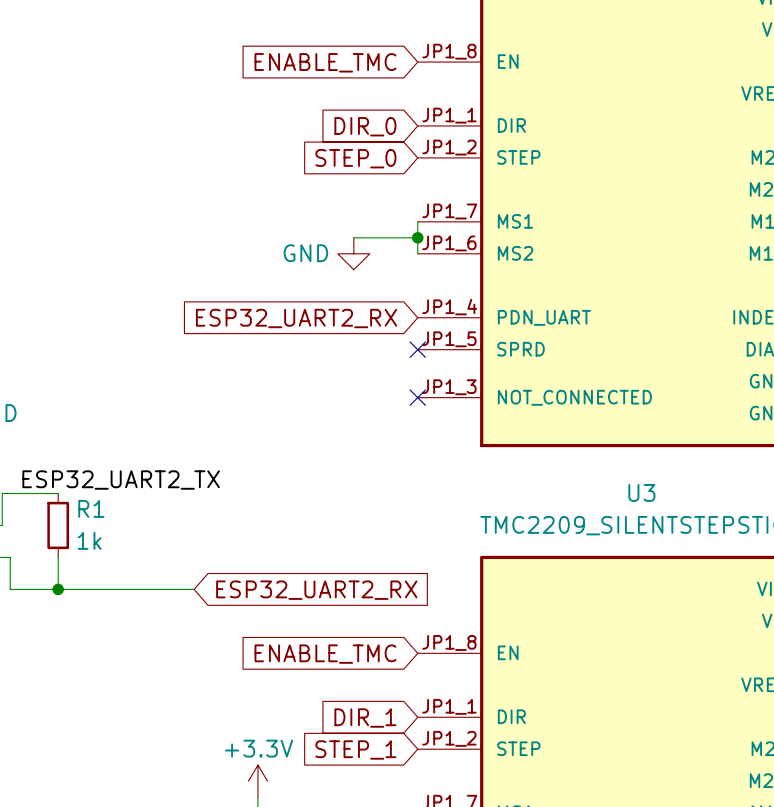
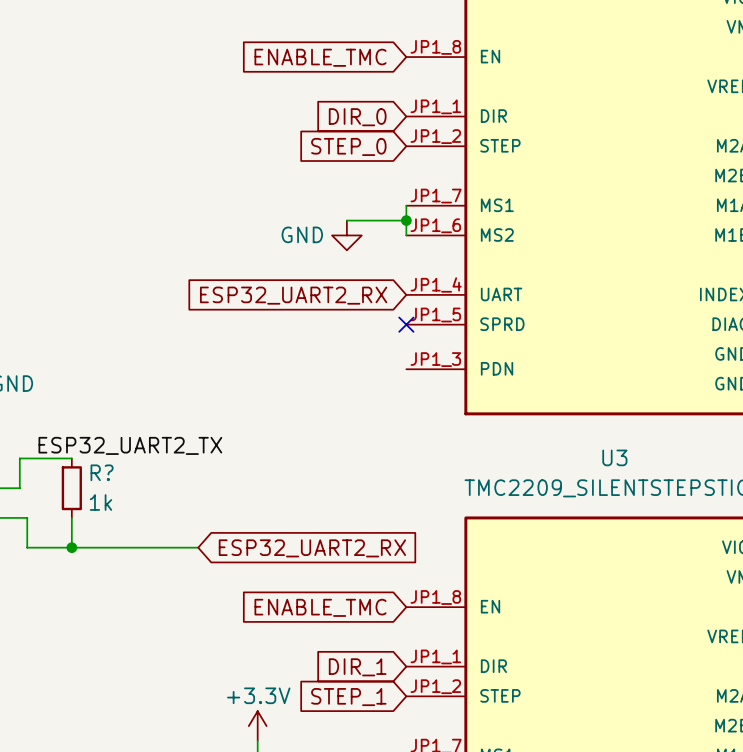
part pin name: PDN_UART (544, 317) -> UART (501, 294)
no-connect mark: (417, 397) -> none
part pin name: NOT_CONNECTED (574, 397) -> PDN (497, 368)
R1 name: R1 (91, 508) -> R? (102, 472)

